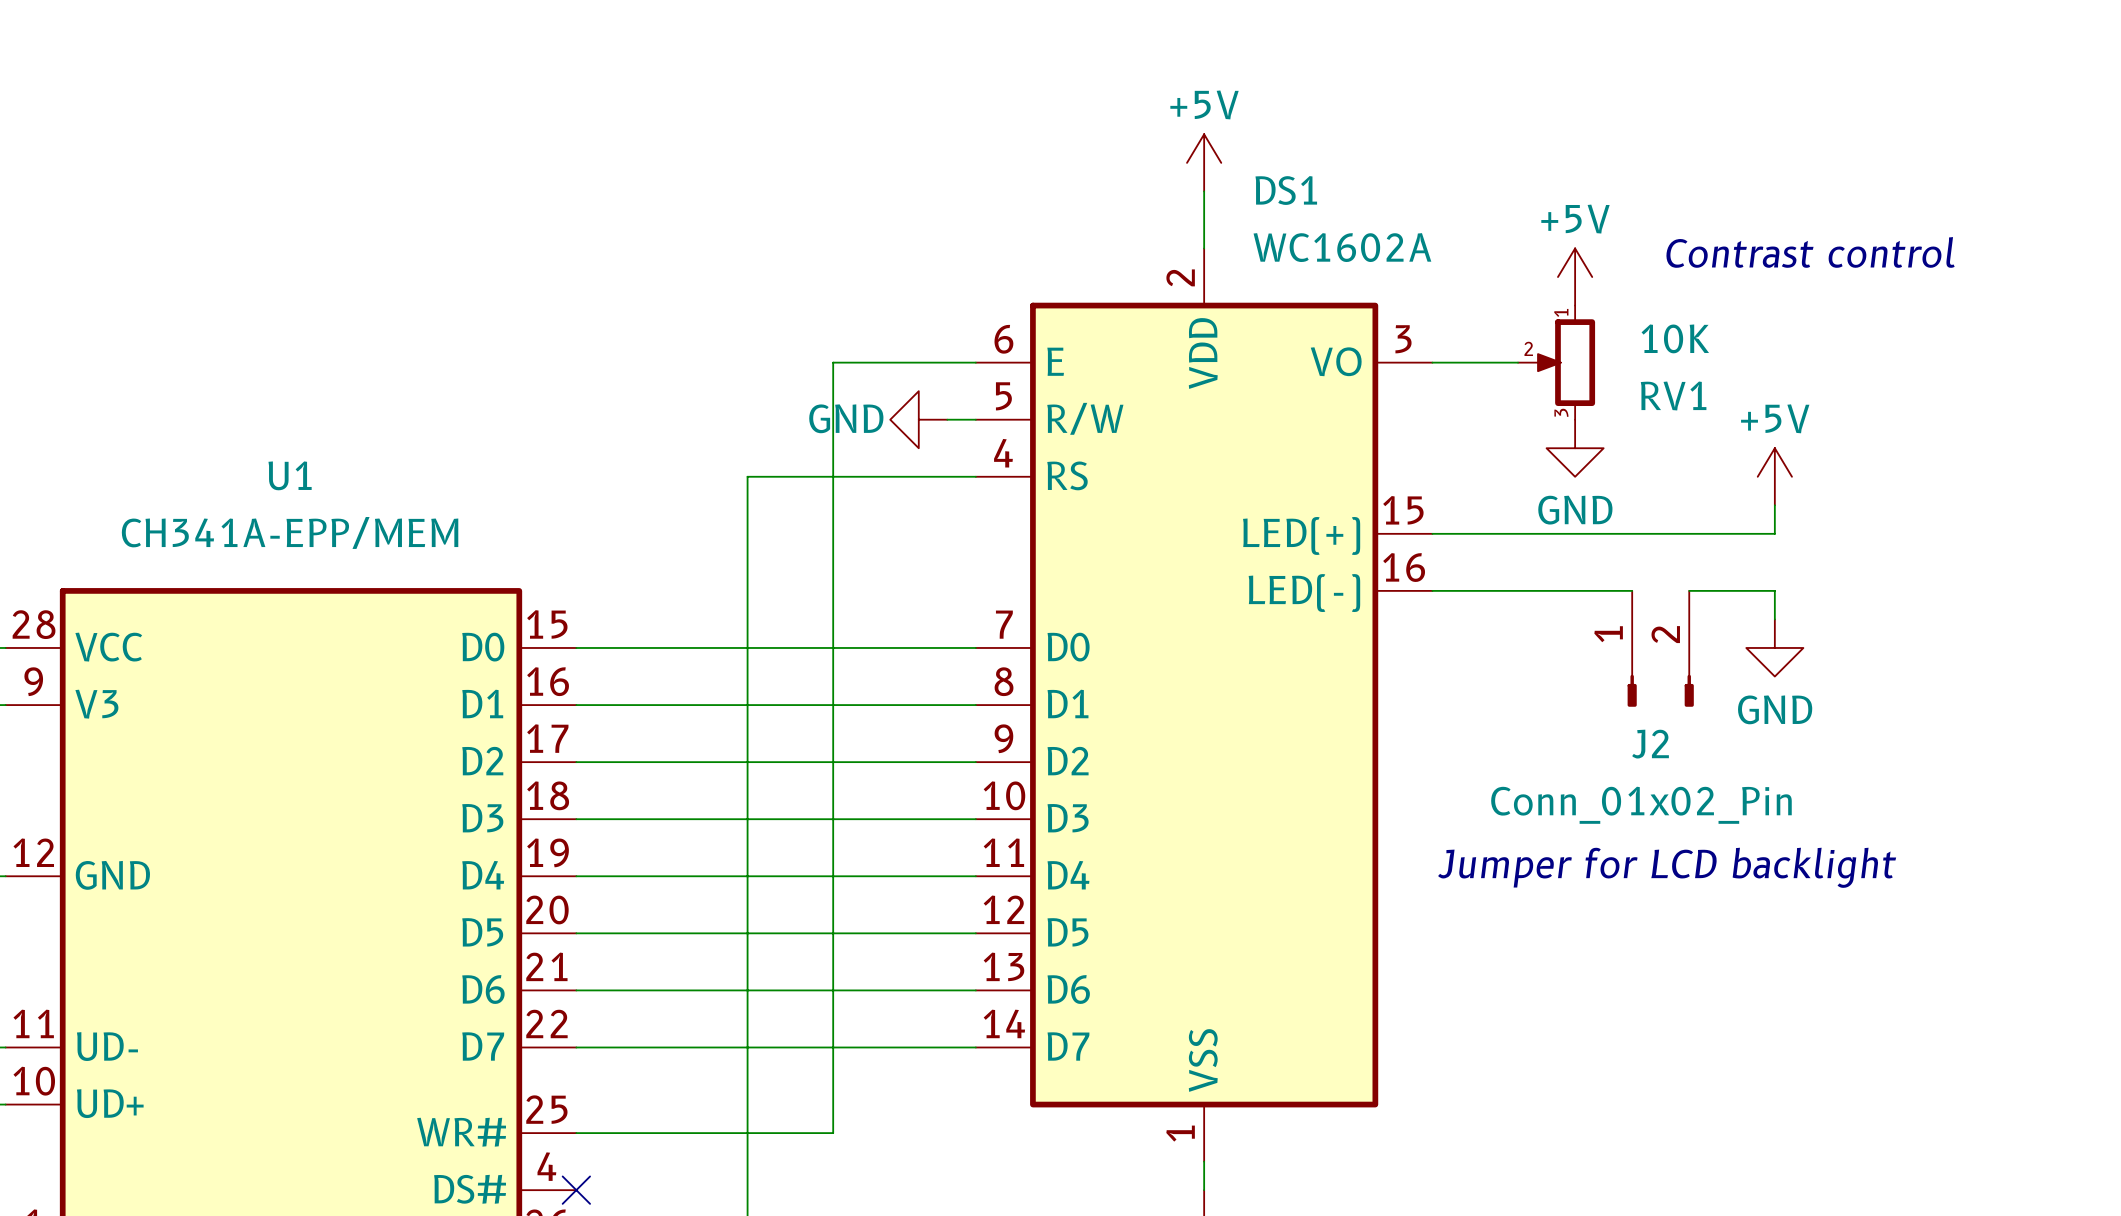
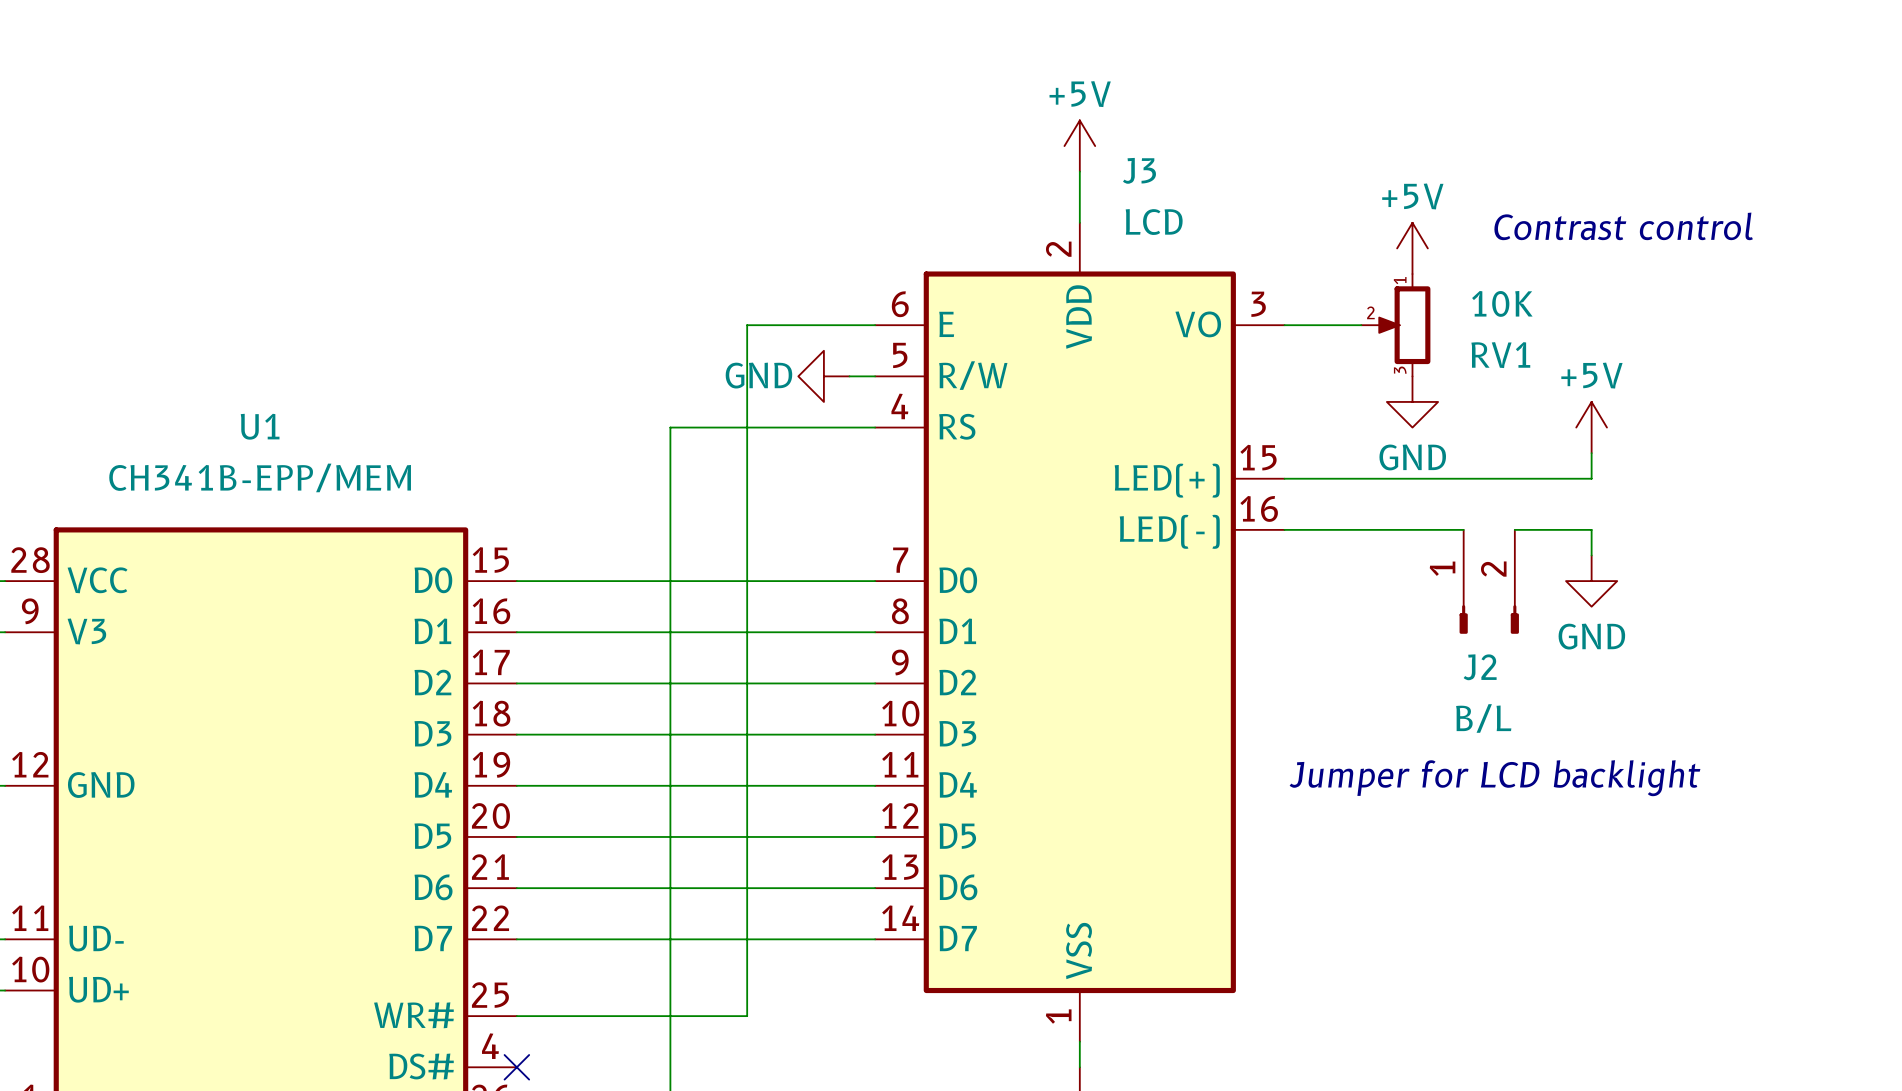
DS1 name: DS1 (1286, 190) -> J3 (1139, 170)
DS1 value: WC1602A (1342, 247) -> LCD (1154, 222)
U1 value: CH341A-EPP/MEM (290, 532) -> CH341B-EPP/MEM (260, 477)
J2 value: Conn_01x02_Pin (1641, 805) -> B/L (1483, 718)

